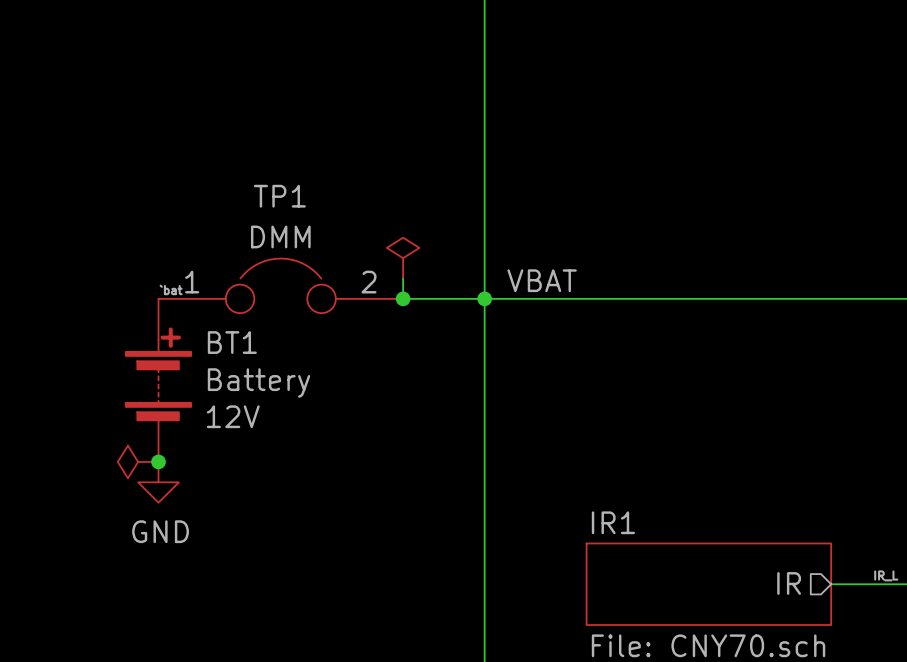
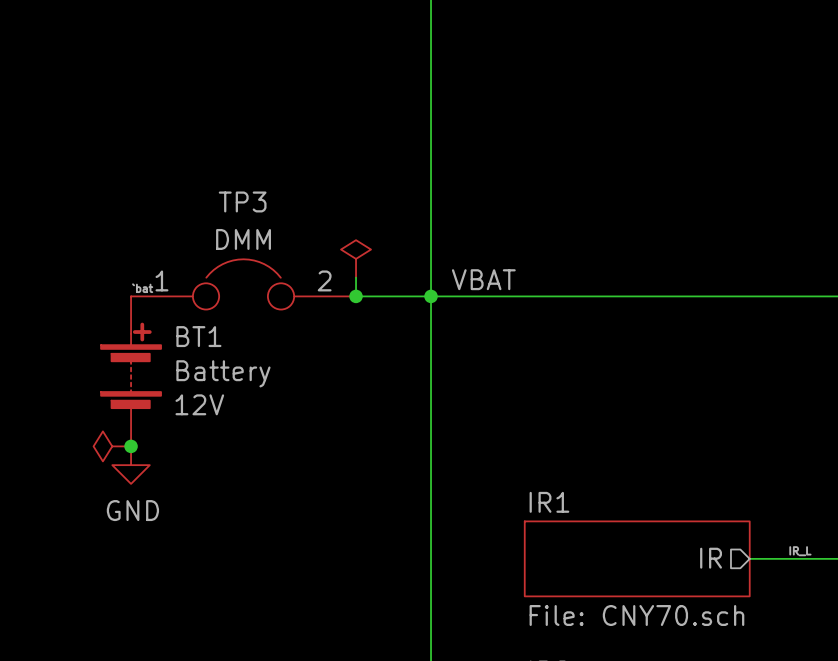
TP1 name: TP1 (279, 196) -> TP3 (242, 201)

